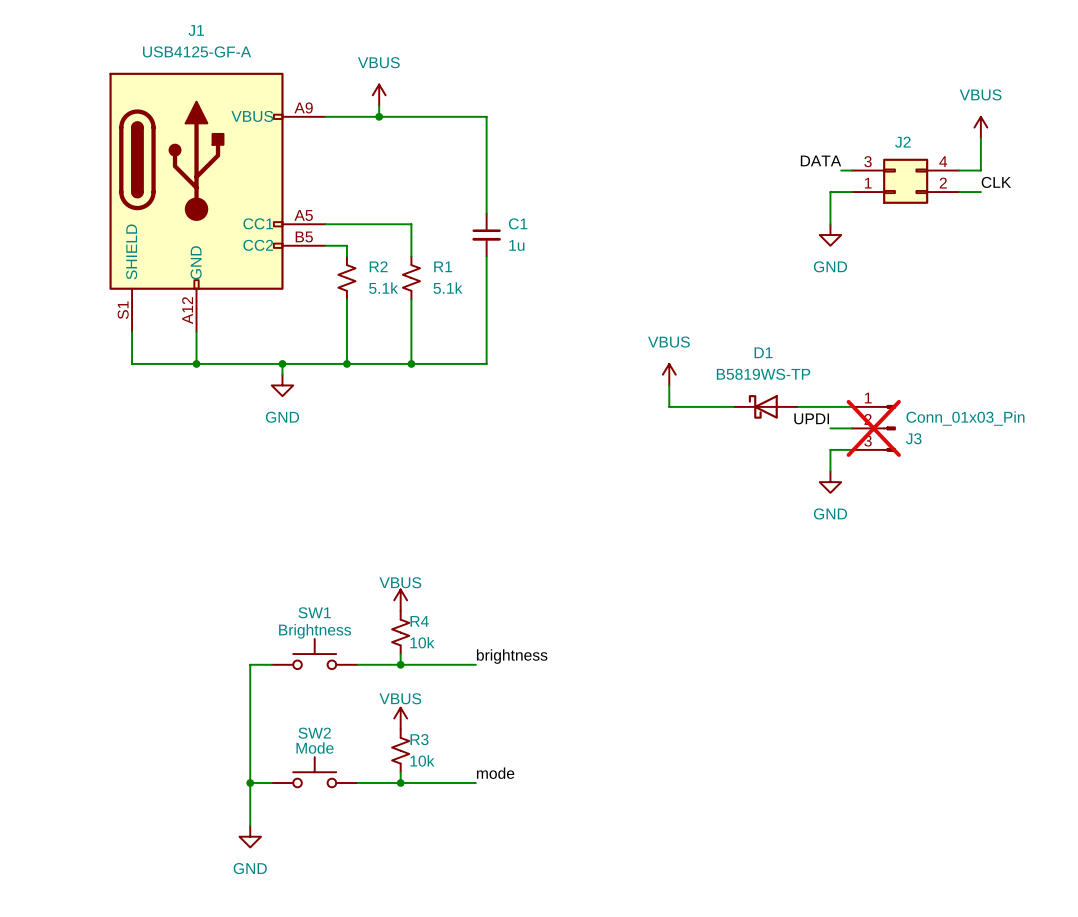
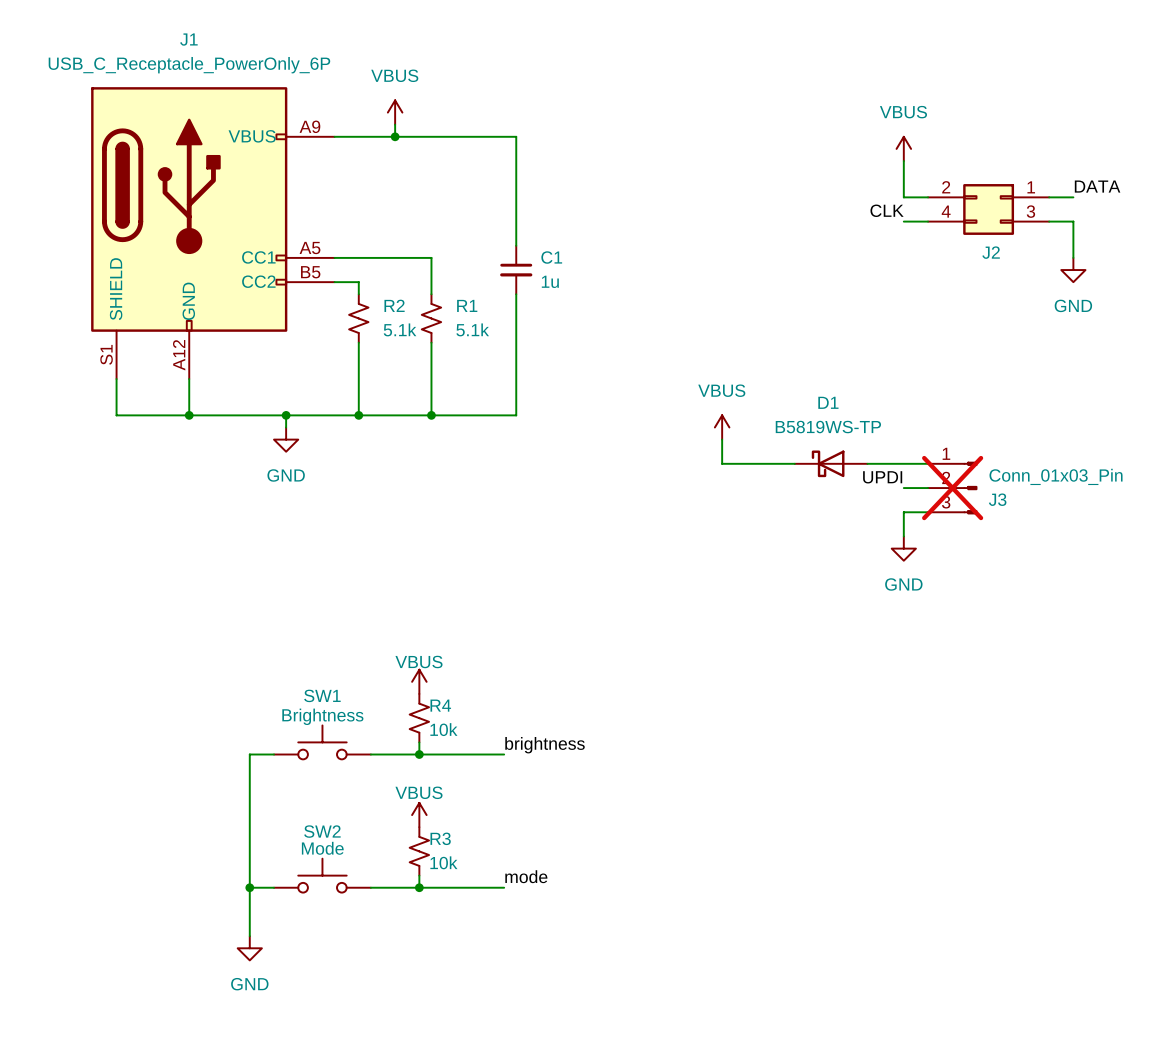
J1 value: USB4125-GF-A (197, 51) -> USB_C_Receptacle_PowerOnly_6P (189, 65)
power symbol position: VBUS (980, 127) -> VBUS (903, 148)
wire: none -> (903, 161) (903, 197) (915, 197)
wire: (980, 138) (980, 170) -> (1073, 221) (1073, 257)
label position: DATA (821, 160) -> DATA (1097, 186)
J2 rotation: 0° (905, 181) -> 180° (988, 209)
label position: CLK (996, 182) -> CLK (887, 210)
wire: (830, 192) (830, 224) -> none
power symbol position: GND (830, 235) -> GND (1073, 270)

